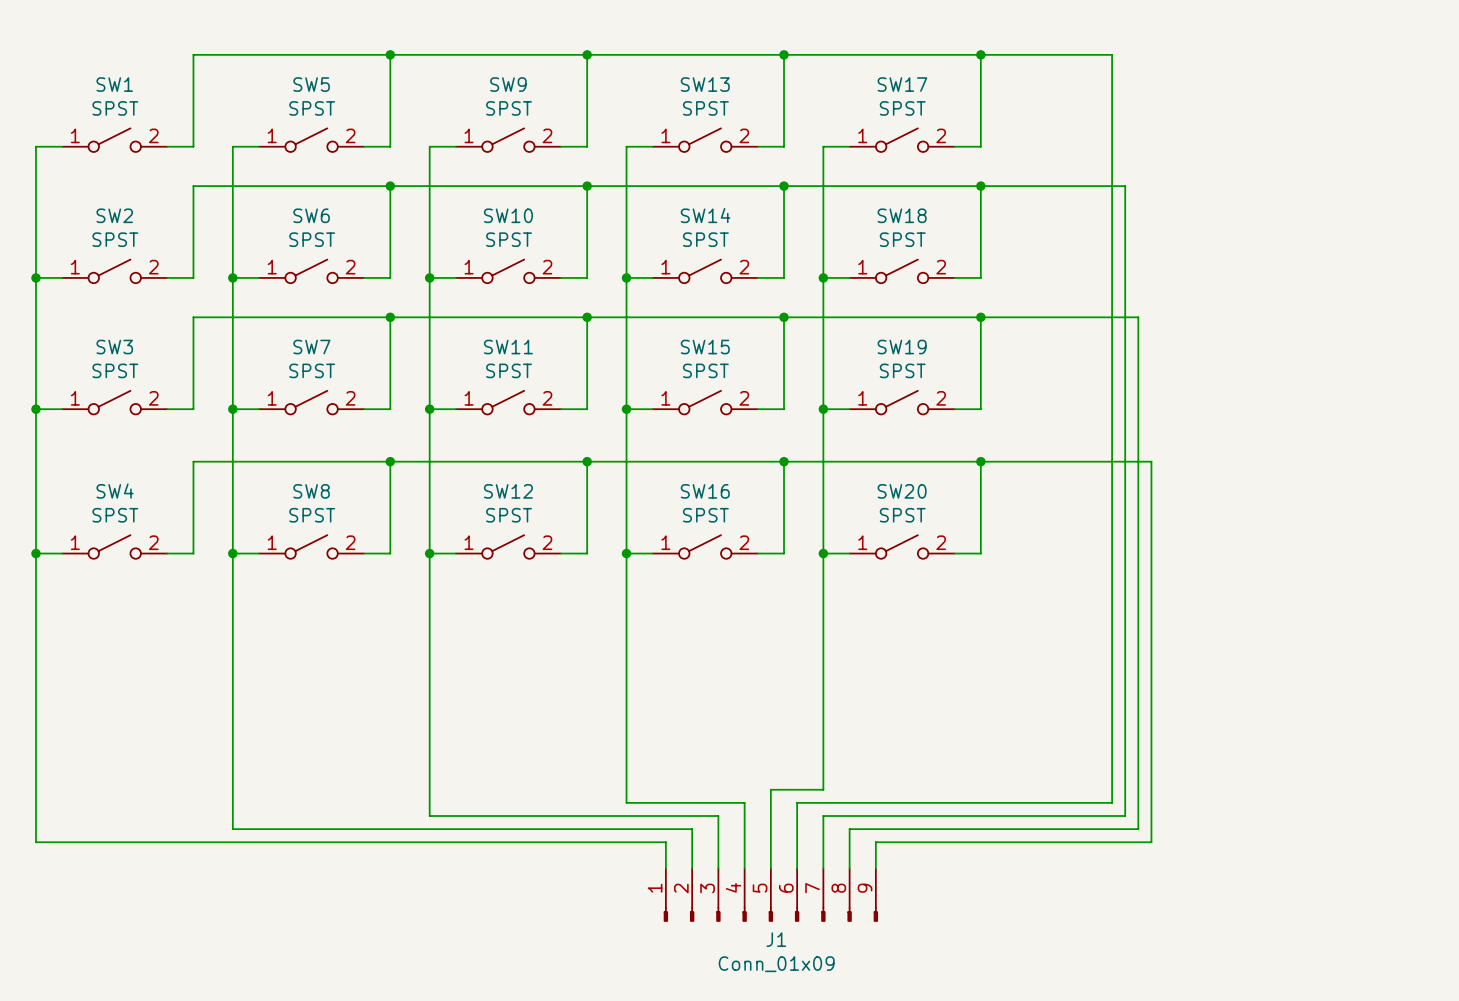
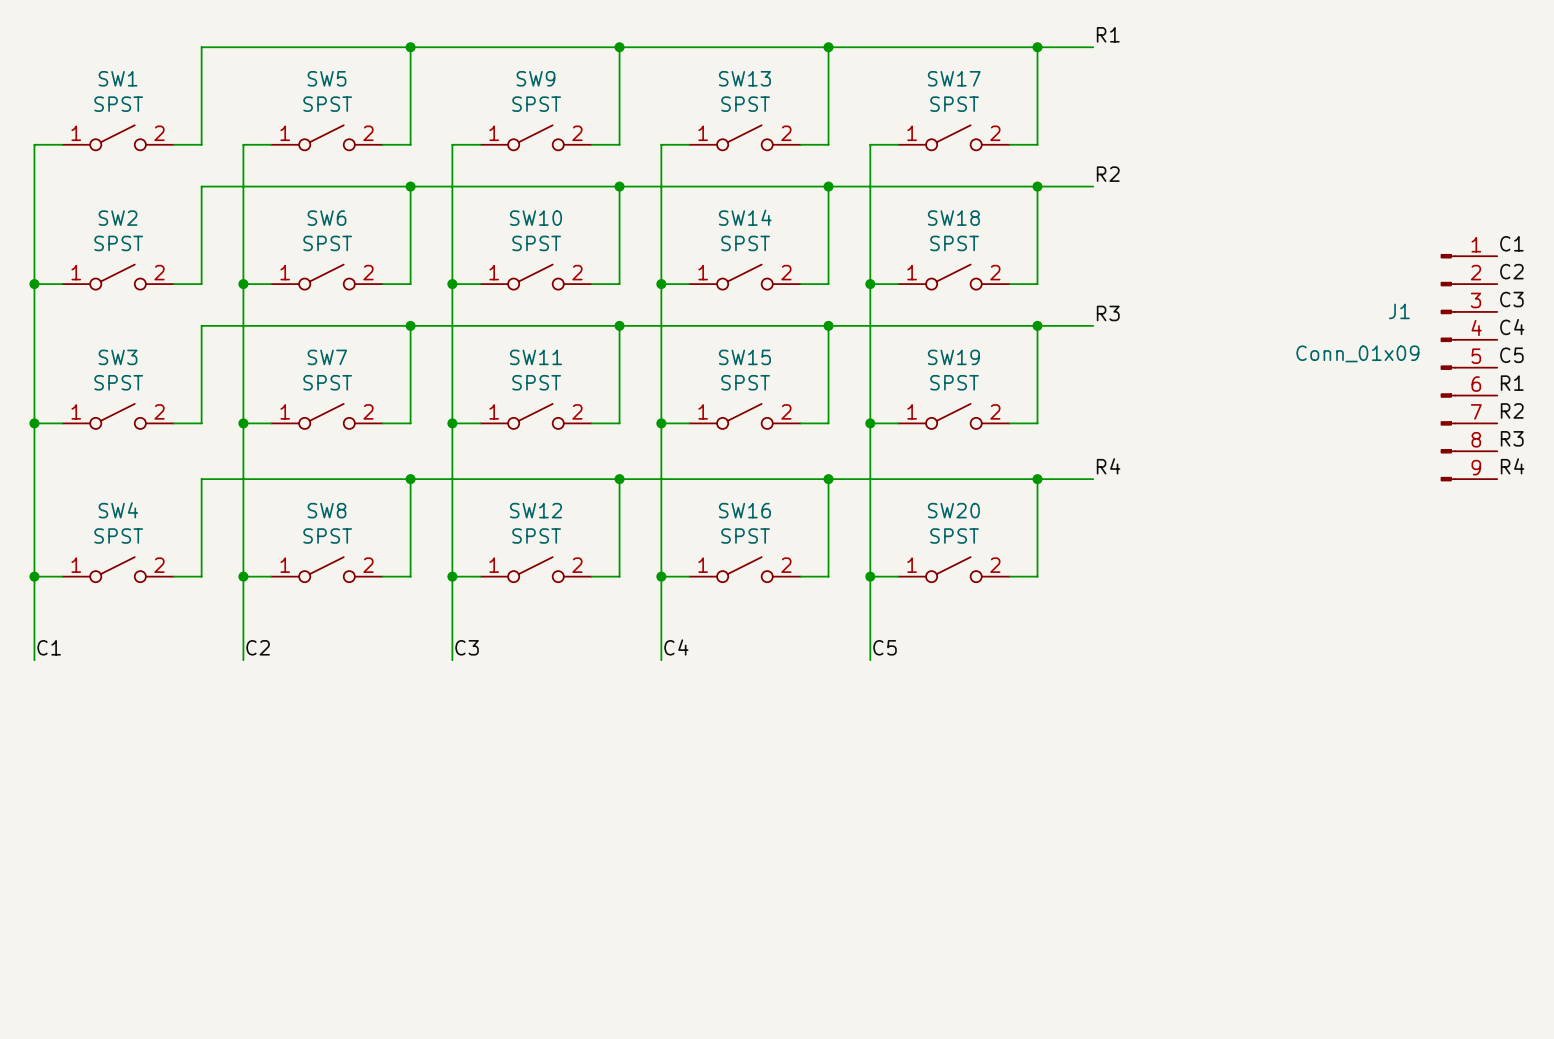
label: none -> R1 (1108, 34)
wire: (1033, 54) (1112, 54) (1112, 802) (797, 802) (797, 868) -> none
label: none -> R2 (1108, 174)
wire: (1033, 186) (1125, 186) (1125, 816) (823, 816) (823, 868) -> none
label: none -> C1 (1511, 243)
label: none -> C2 (1511, 271)
label: none -> C3 (1511, 299)
label: none -> R3 (1108, 313)
wire: (1033, 317) (1138, 317) (1138, 829) (849, 829) (849, 868) -> none
label: none -> C4 (1512, 327)
label: none -> C5 (1511, 355)
label: none -> R1 (1512, 383)
label: none -> R2 (1512, 410)
label: none -> R3 (1512, 438)
label: none -> R4 (1108, 466)
label: none -> R4 (1512, 466)
wire: (1033, 461) (1151, 461) (1151, 842) (875, 842) (875, 868) -> none
label: none -> C1 (49, 647)
label: none -> C2 (258, 647)
label: none -> C3 (467, 647)
label: none -> C4 (676, 647)
label: none -> C5 (885, 647)
wire: (35, 632) (35, 842) (665, 842) (665, 868) -> none
wire: (232, 632) (232, 829) (692, 829) (692, 868) -> none
wire: (429, 632) (429, 816) (718, 816) (718, 868) -> none
wire: (626, 632) (626, 802) (744, 802) (744, 868) -> none
wire: (823, 632) (823, 789) (770, 789) (770, 868) -> none
J1 position: (770, 895) -> (1468, 367)
J1 rotation: 0° (770, 914) -> 90° clockwise (1448, 367)
J1 name position: J1 (776, 939) -> J1 (1399, 311)
J1 value position: Conn_01x09 (776, 964) -> Conn_01x09 (1357, 353)

